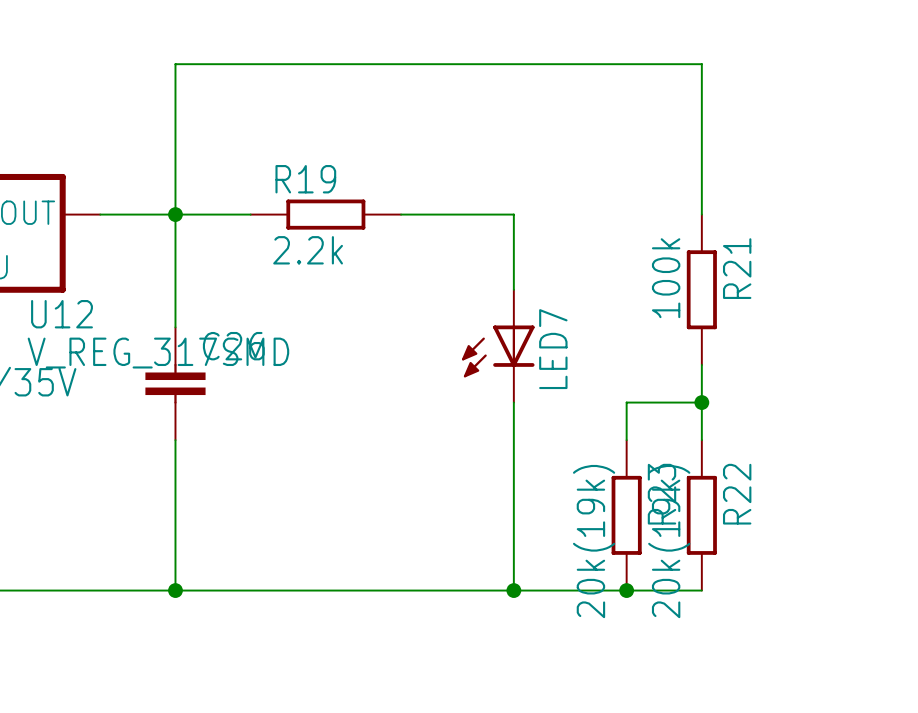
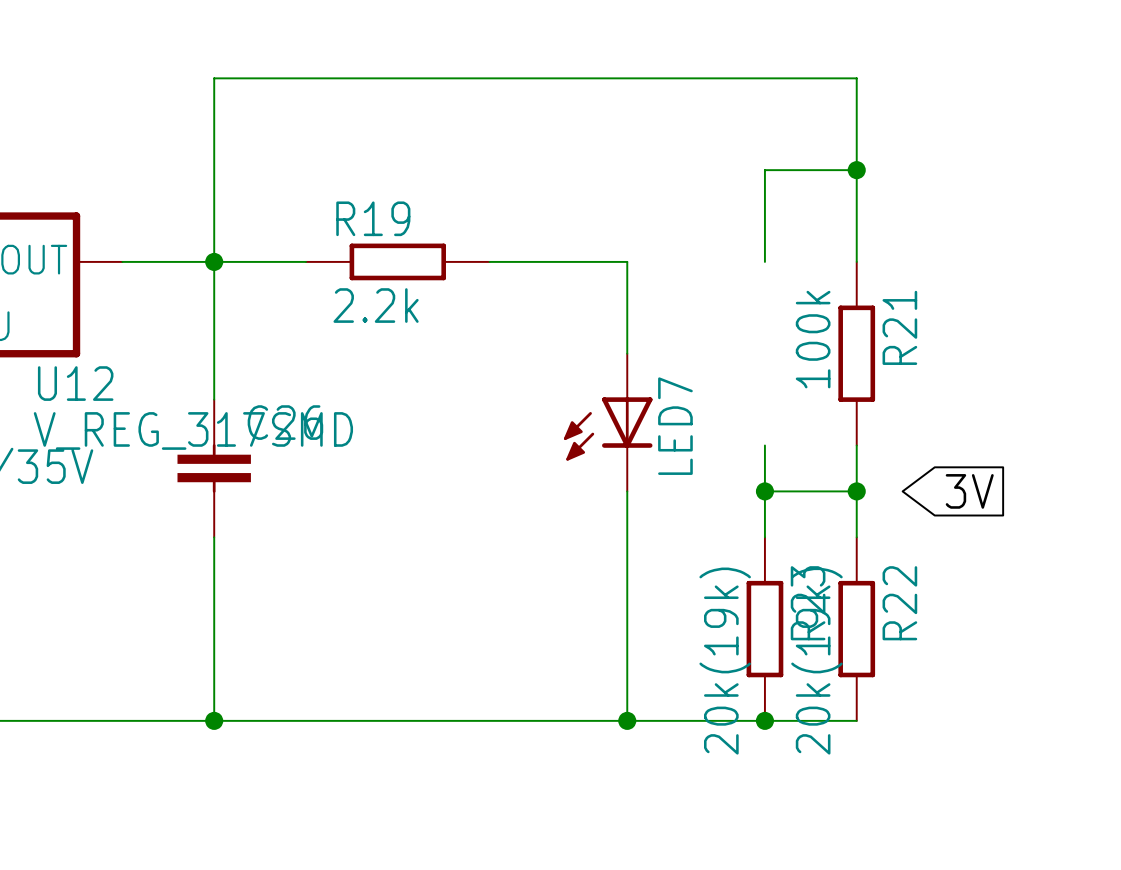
wire: none -> (856, 170) (764, 170) (764, 261)
junction: none -> (856, 170)
wire: none -> (764, 445) (764, 491)
junction: none -> (764, 491)
global label: none -> 3V (969, 491)

